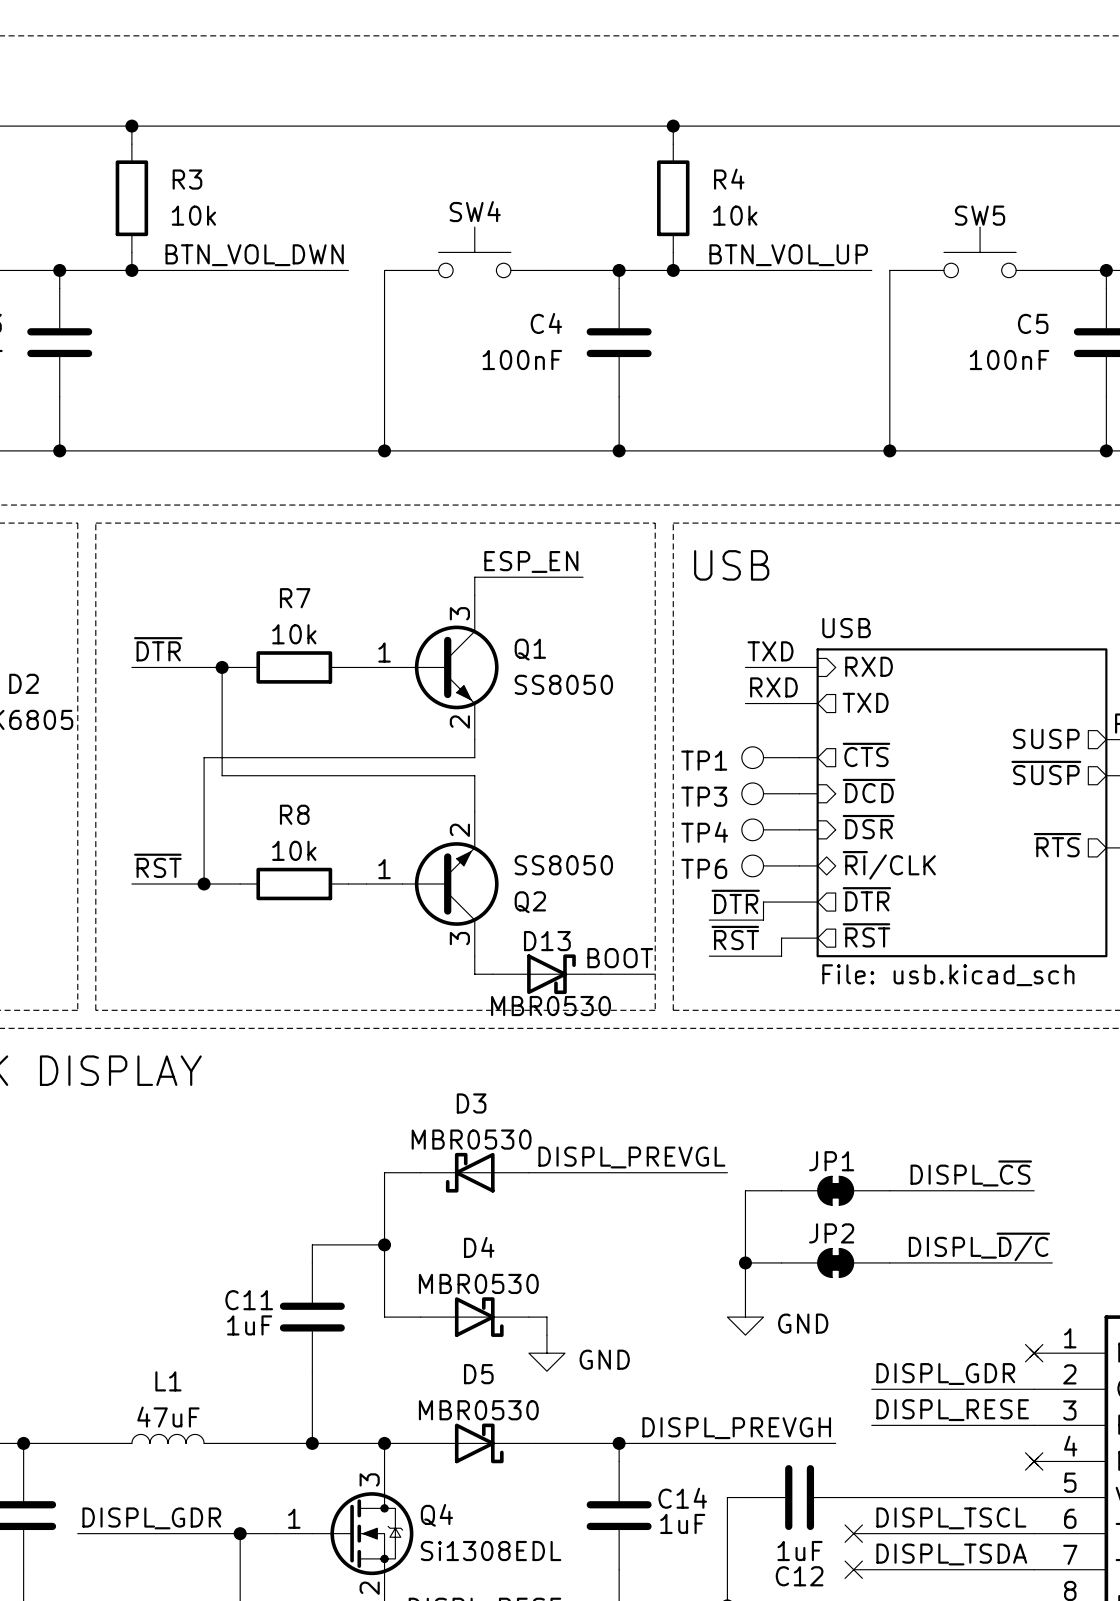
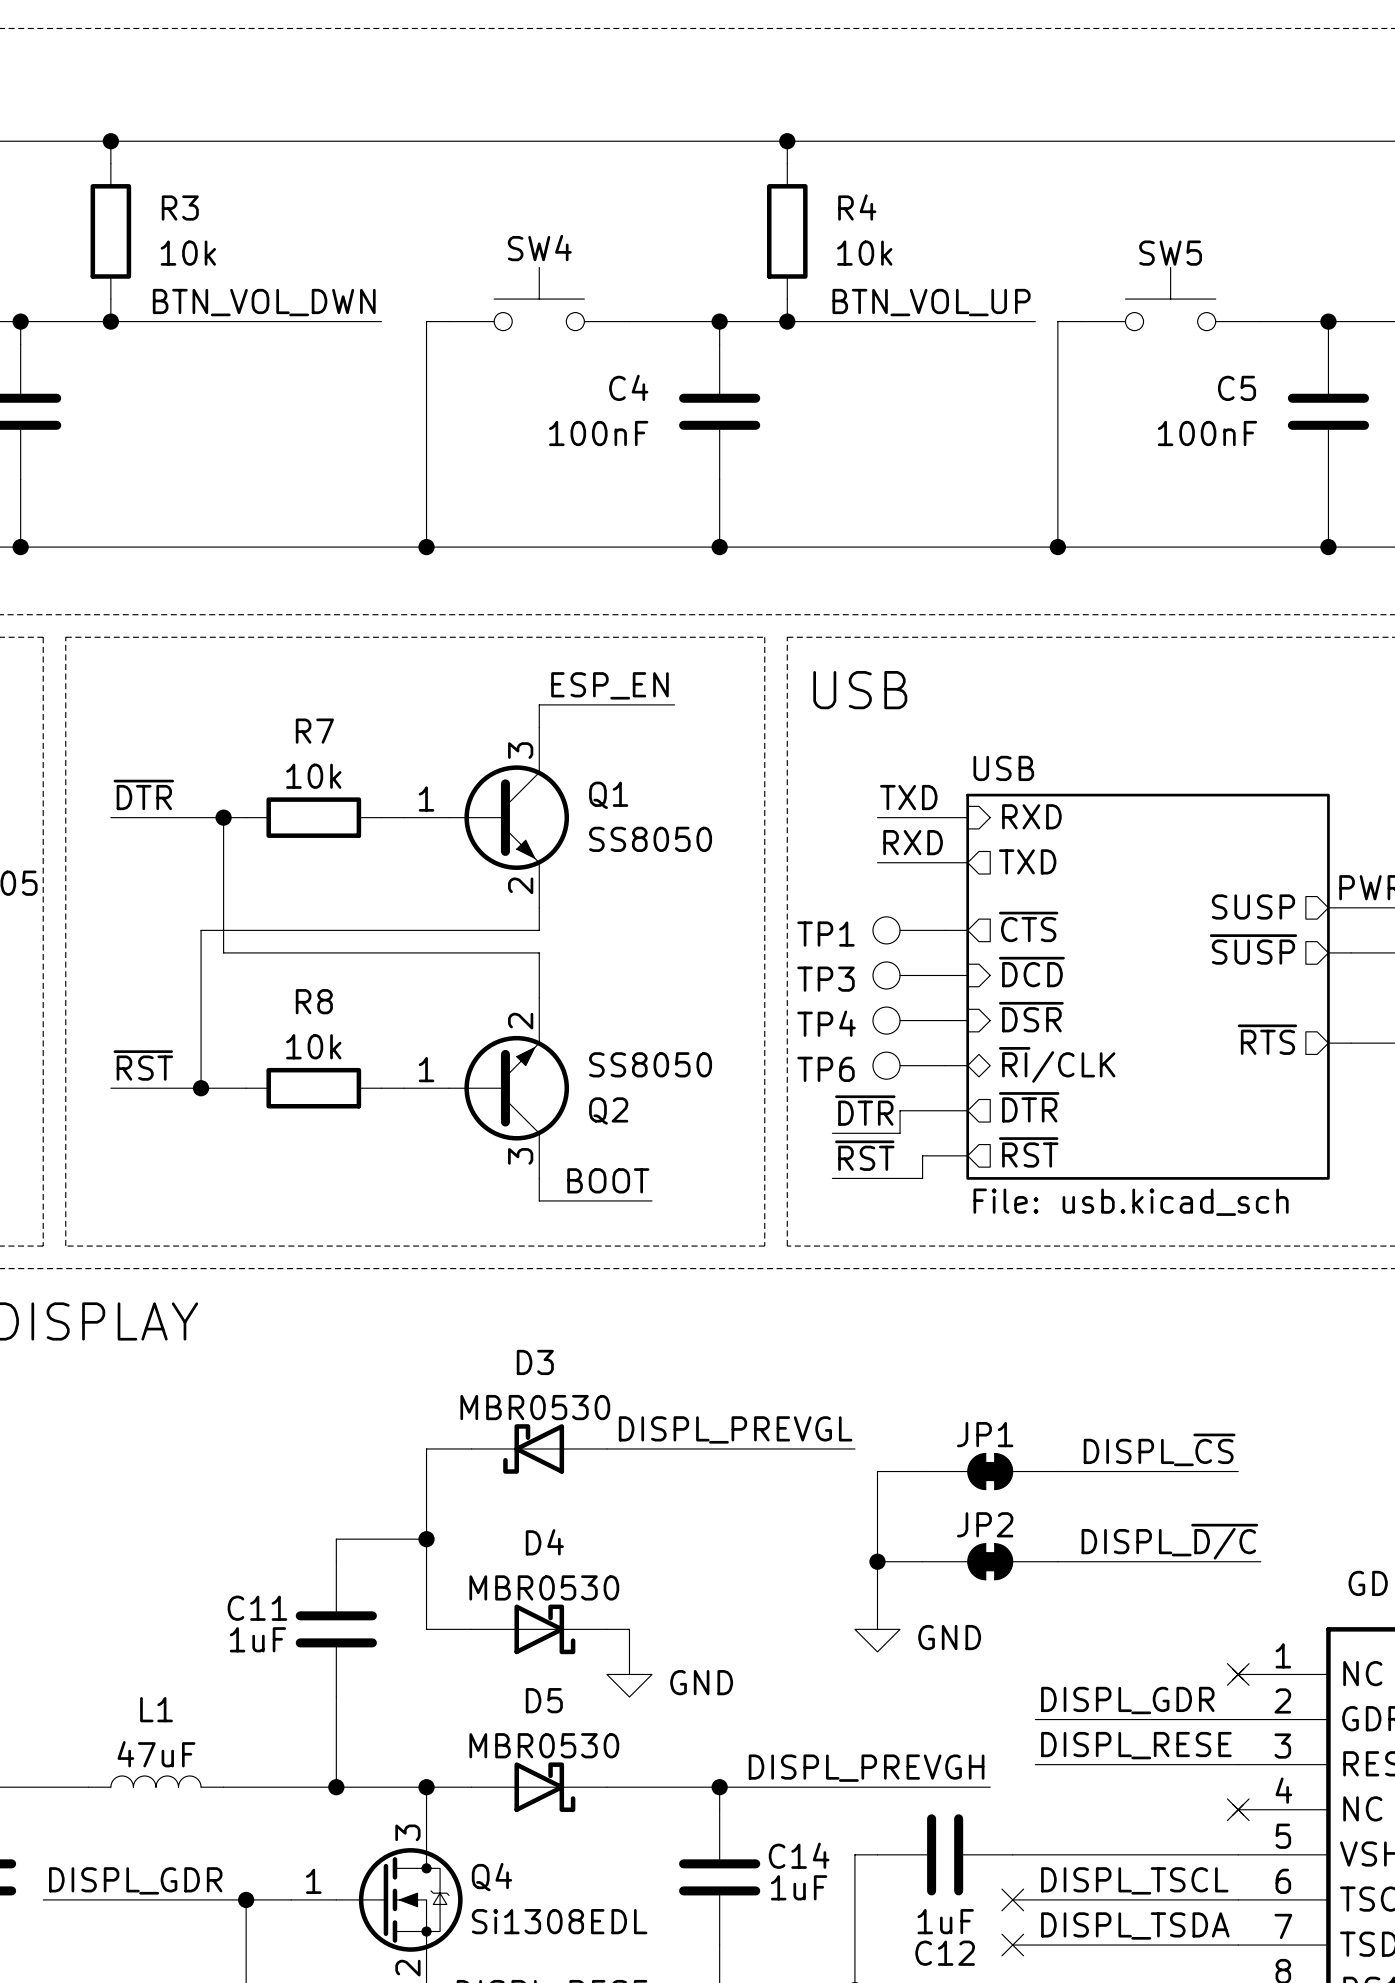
label position: BOOT (620, 958) -> BOOT (608, 1180)
D13: MBR0530 (546, 974) -> none
wire: (601, 974) (655, 974) -> none

